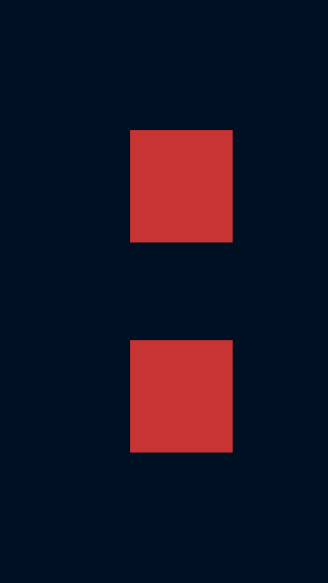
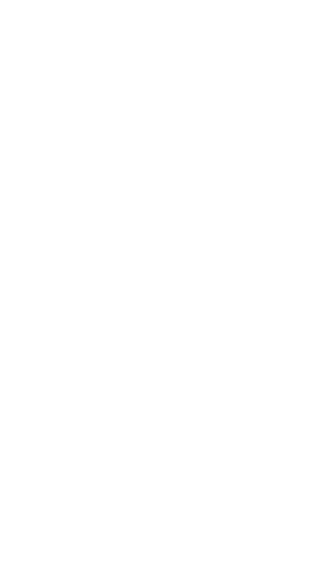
part: (181, 291) -> none

